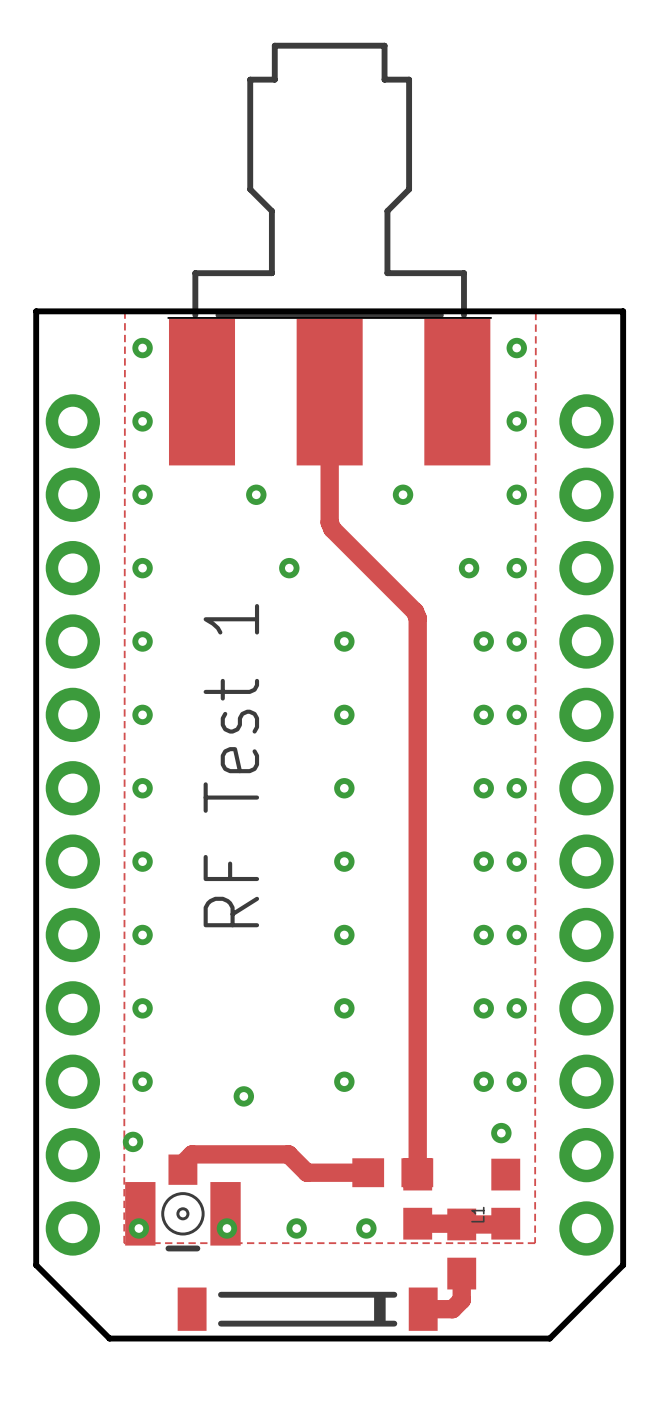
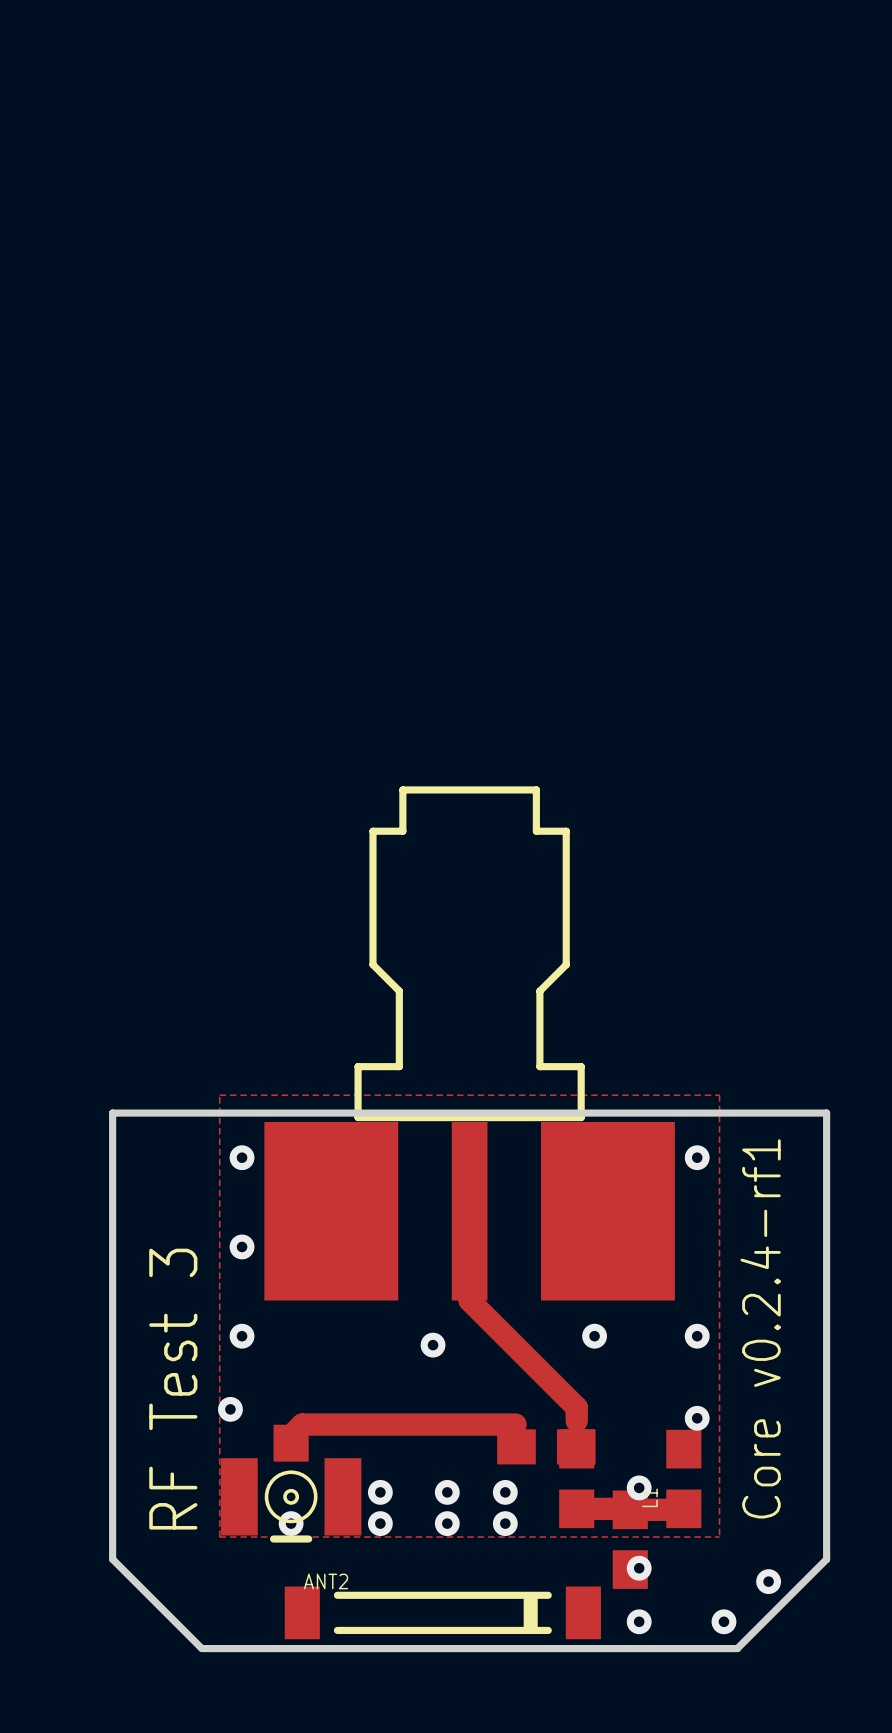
part: (329, 254) -> none
zone outline: (124, 312) (124, 1243) (535, 1243) (535, 312) (124, 312) -> none
via: (142, 348) -> none
via: (516, 348) -> none
track: (329, 392) (329, 522) (332, 529) (415, 611) (417, 618) (417, 1140) -> (469, 1296) (469, 1300) (576, 1407)
via: (142, 421) -> none
via: (516, 421) -> none
via: (142, 494) -> none
via: (256, 494) -> none
via: (403, 494) -> none
via: (516, 494) -> none
via: (142, 568) -> none
via: (289, 568) -> none
via: (469, 568) -> none
via: (516, 568) -> none
via: (142, 641) -> none
via: (344, 641) -> none
via: (483, 641) -> none
via: (516, 641) -> none
via: (142, 714) -> none
via: (344, 714) -> none
via: (483, 714) -> none
via: (516, 714) -> none
text: RF Test 1 (231, 765) -> none
via: (142, 788) -> none
via: (344, 788) -> none
via: (483, 788) -> none
via: (516, 788) -> none
part: (72, 824) -> none
part: (586, 824) -> none
part: none -> (469, 1043)
via: (142, 861) -> none
via: (344, 861) -> none
via: (483, 861) -> none
via: (516, 861) -> none
zone outline: none -> (219, 1095) (219, 1537) (719, 1537) (719, 1095) (219, 1095)
board edge: (36, 898) (36, 311) (623, 311) (623, 898) -> (112, 1113) (826, 1113)
via: (344, 935) -> none
via: (483, 935) -> none
via: (344, 1008) -> none
via: (483, 1008) -> none
via: (516, 1008) -> none
text: none -> Core v0.2.4-rf1 (760, 1328)
via: (344, 1081) -> none
via: none -> (594, 1336)
via: (483, 1081) -> none
via: none -> (433, 1345)
via: (243, 1096) -> none
text: none -> RF Test 3 (173, 1389)
via position: (501, 1133) -> (697, 1418)
track: (288, 1154) (306, 1172) (368, 1172) -> (419, 1424) (515, 1424)
via: none -> (639, 1487)
via: none -> (380, 1492)
via: none -> (447, 1492)
via: none -> (505, 1492)
via: (138, 1228) -> none
via: (226, 1228) -> none
via: (296, 1228) -> none
via: (366, 1228) -> none
via: none -> (291, 1523)
via: none -> (380, 1523)
via: none -> (447, 1523)
via: none -> (505, 1523)
via: none -> (639, 1568)
track: (461, 1273) (461, 1300) (452, 1309) (423, 1309) -> none
ANT2 name: none -> ANT2 (326, 1581)
via: none -> (768, 1581)
via: none -> (639, 1621)
via: none -> (723, 1621)

